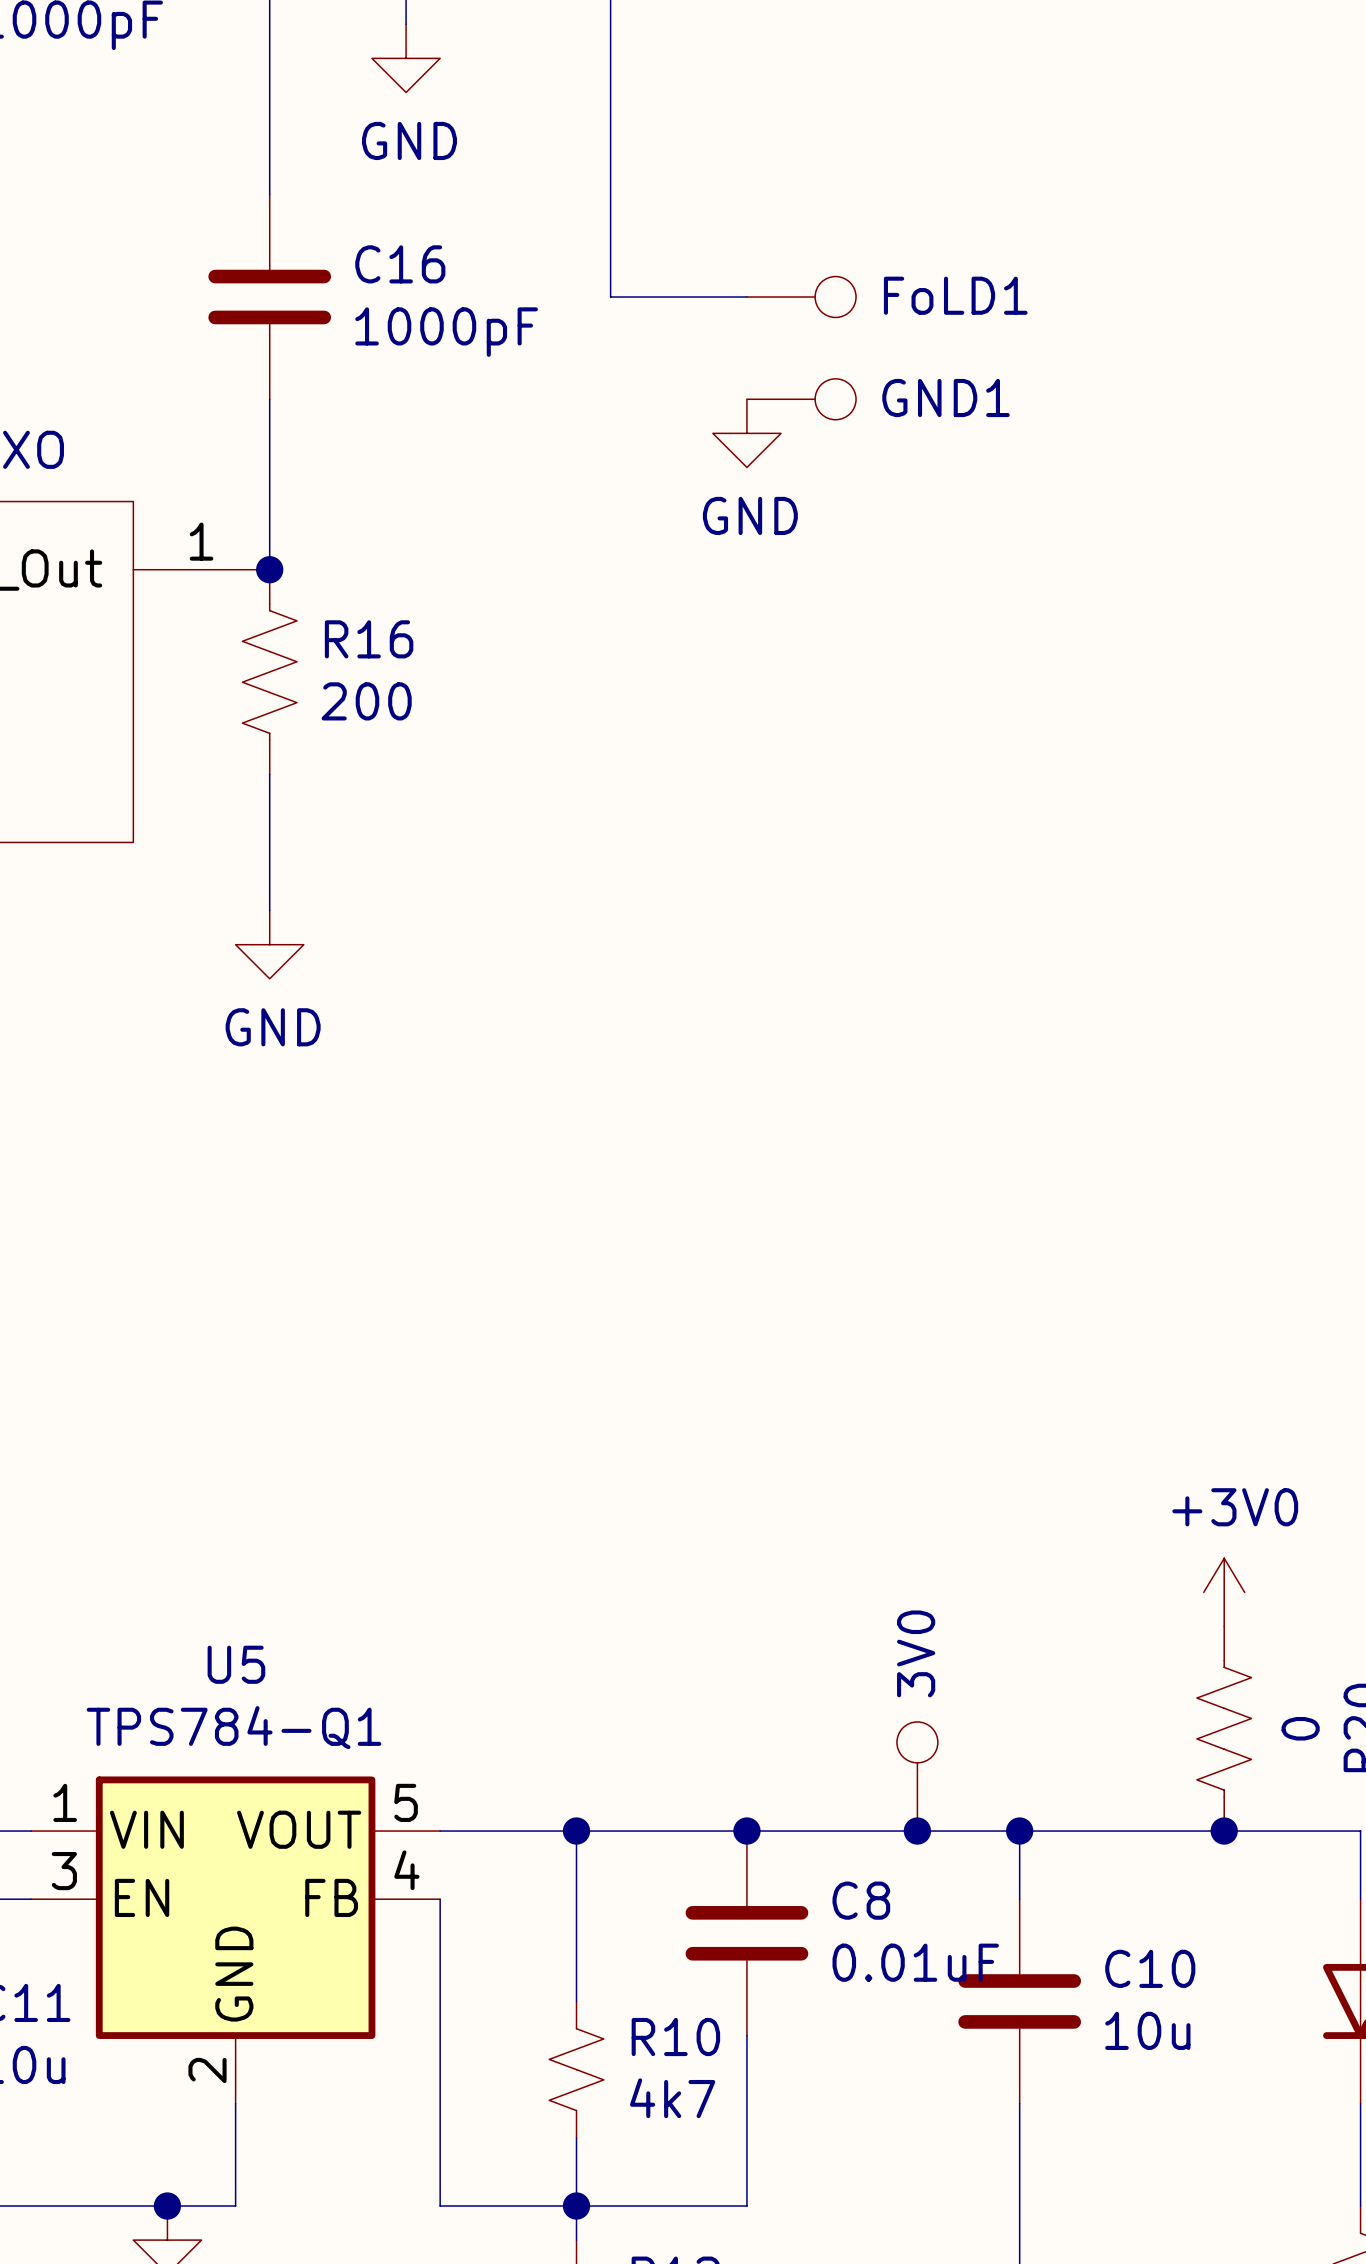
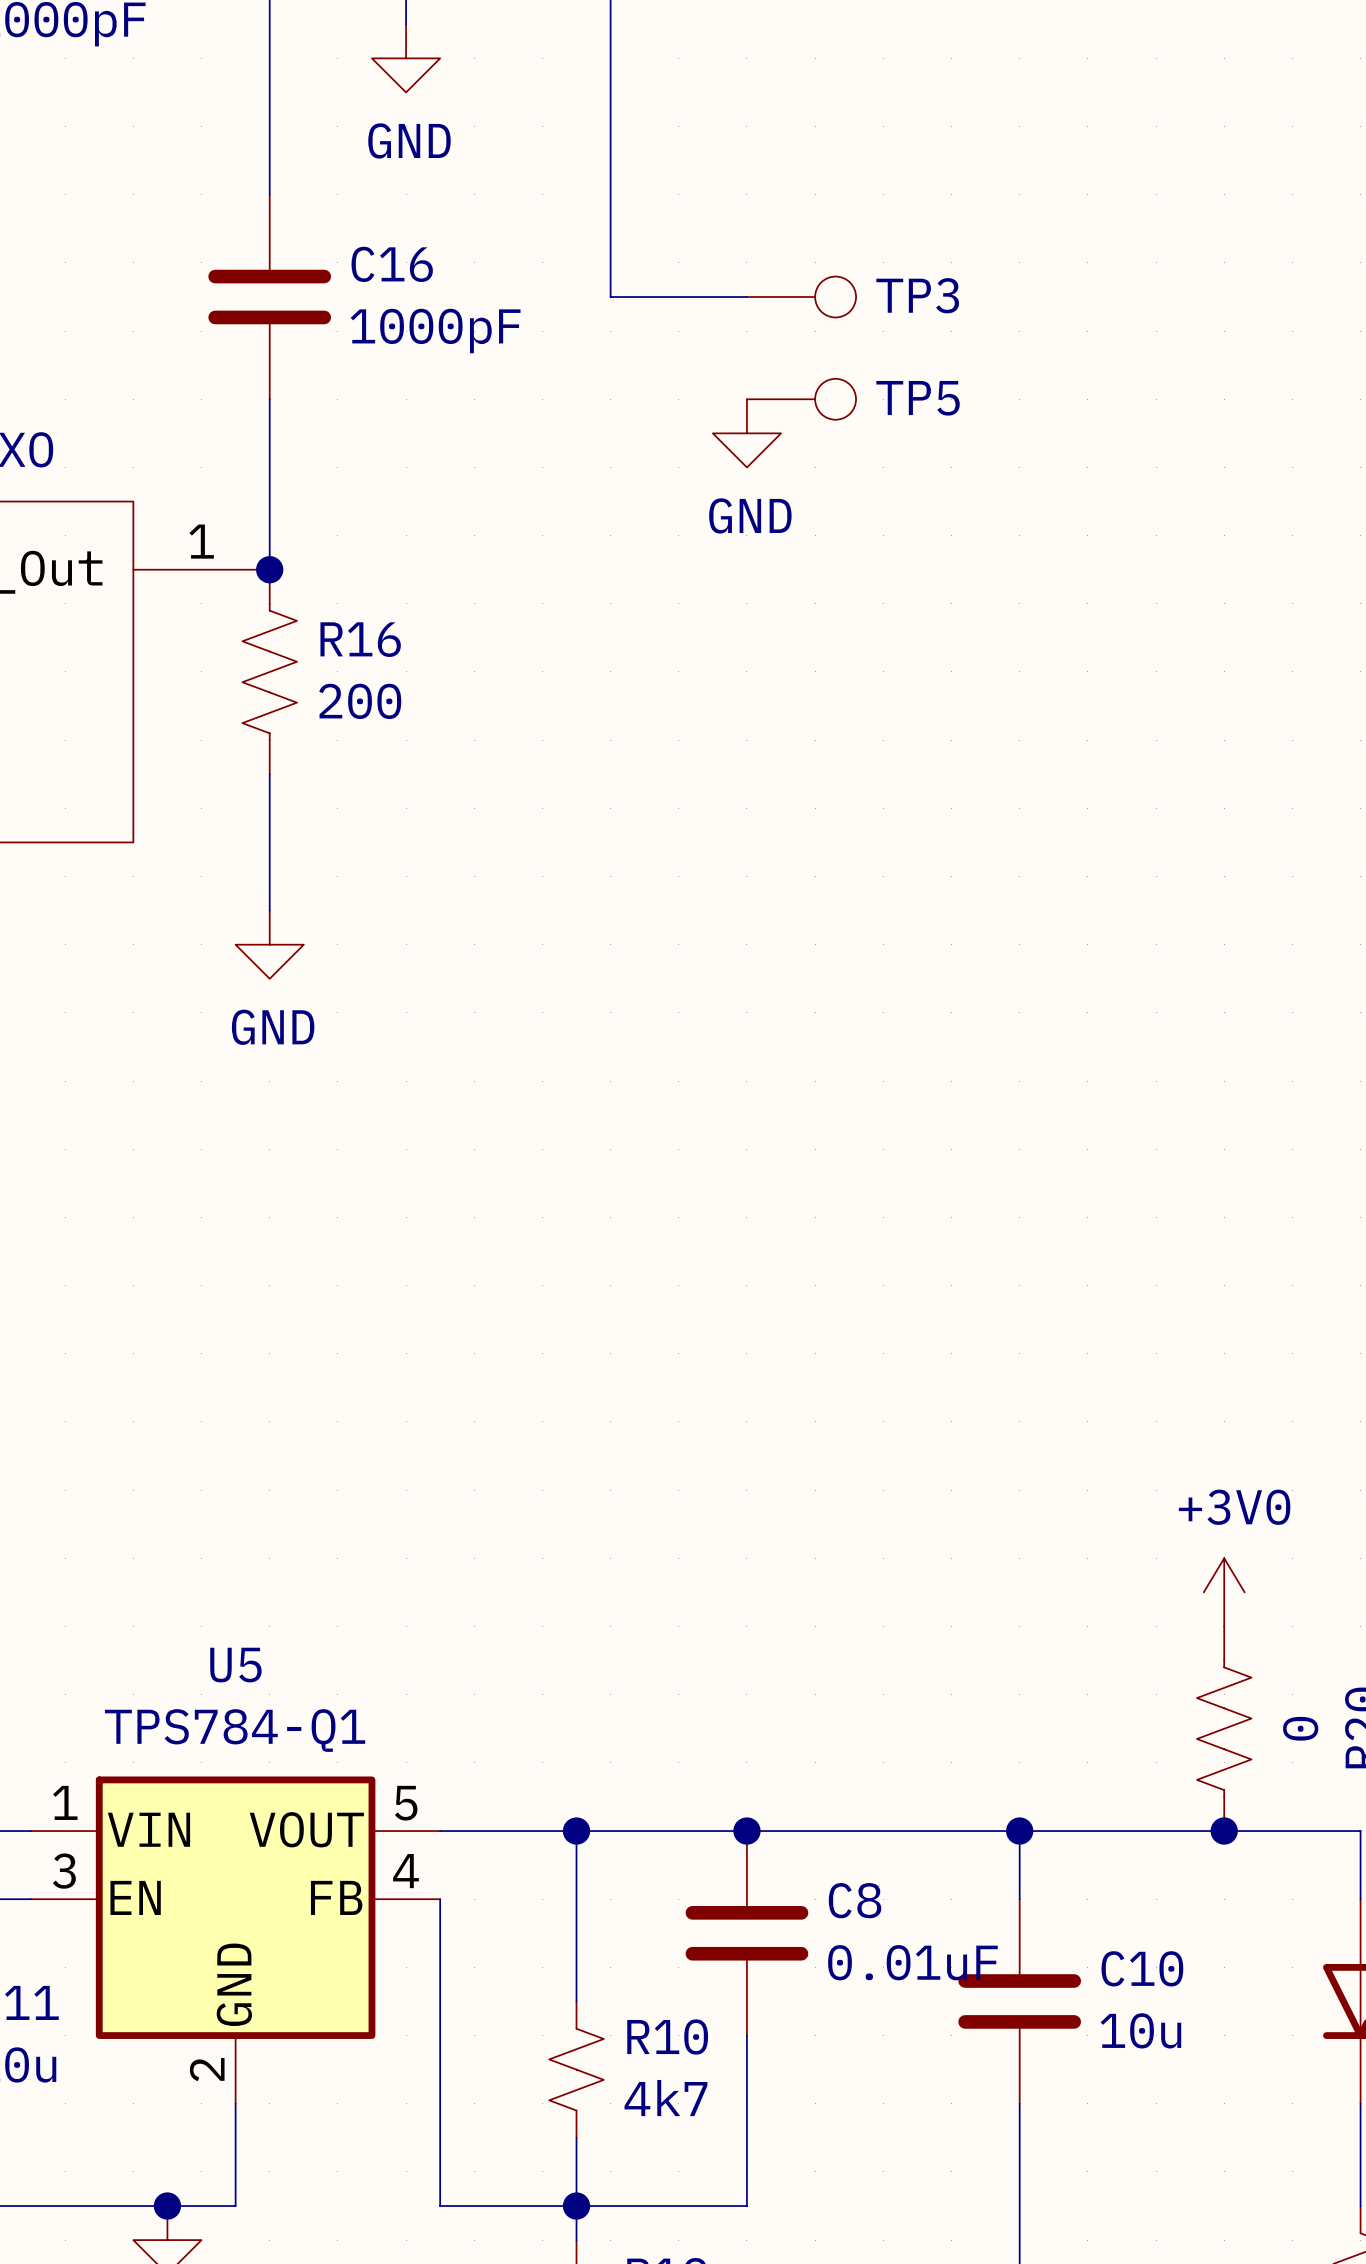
FoLD1 name: FoLD1 (955, 295) -> TP3 (917, 295)
GND1 name: GND1 (946, 398) -> TP5 (918, 398)
3V0: (917, 1776) -> none
junction: (917, 1831) -> none

